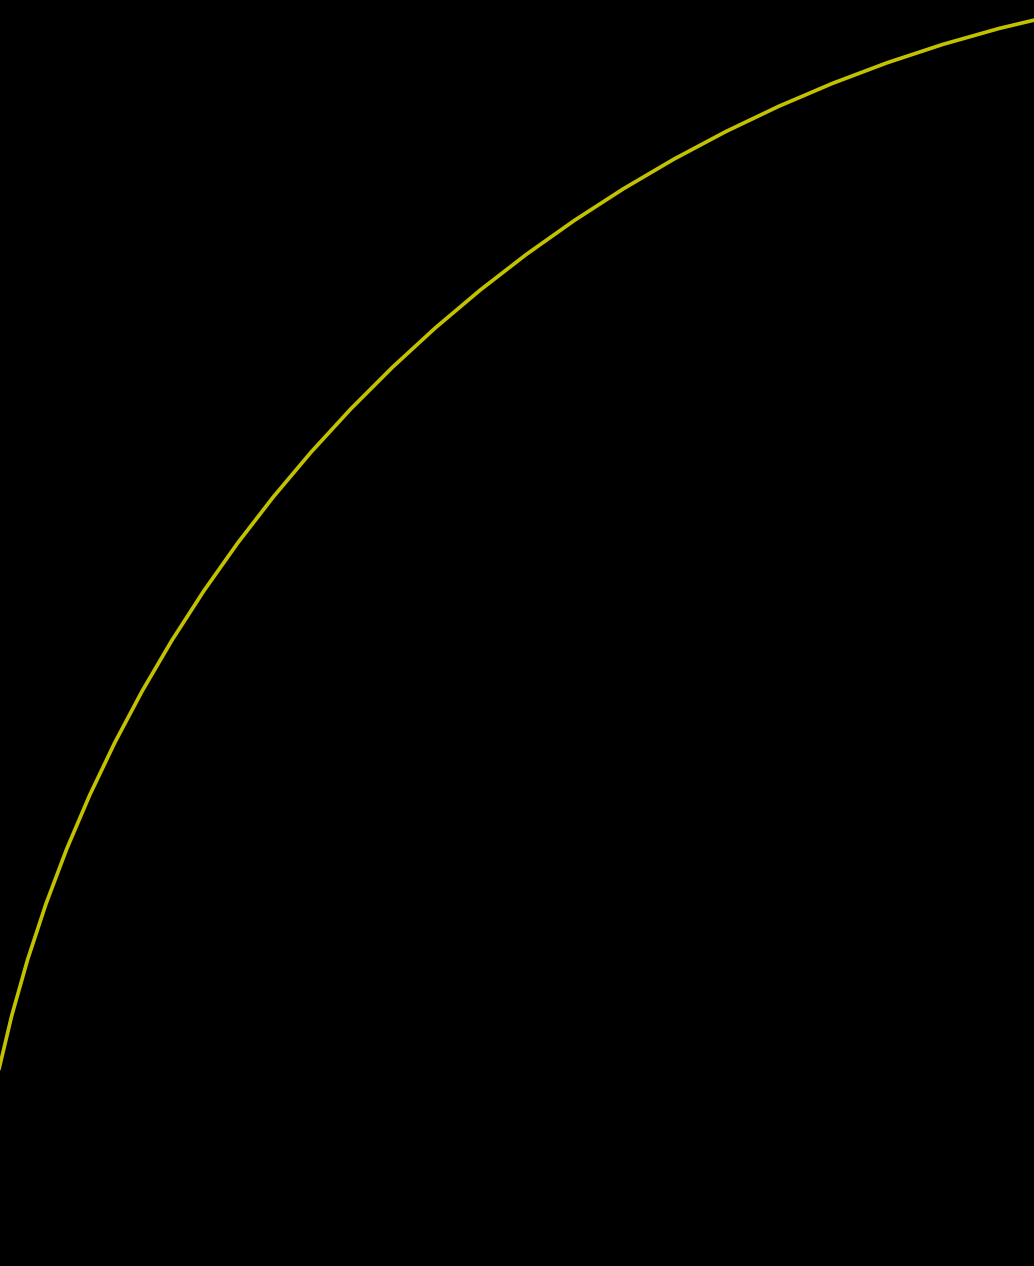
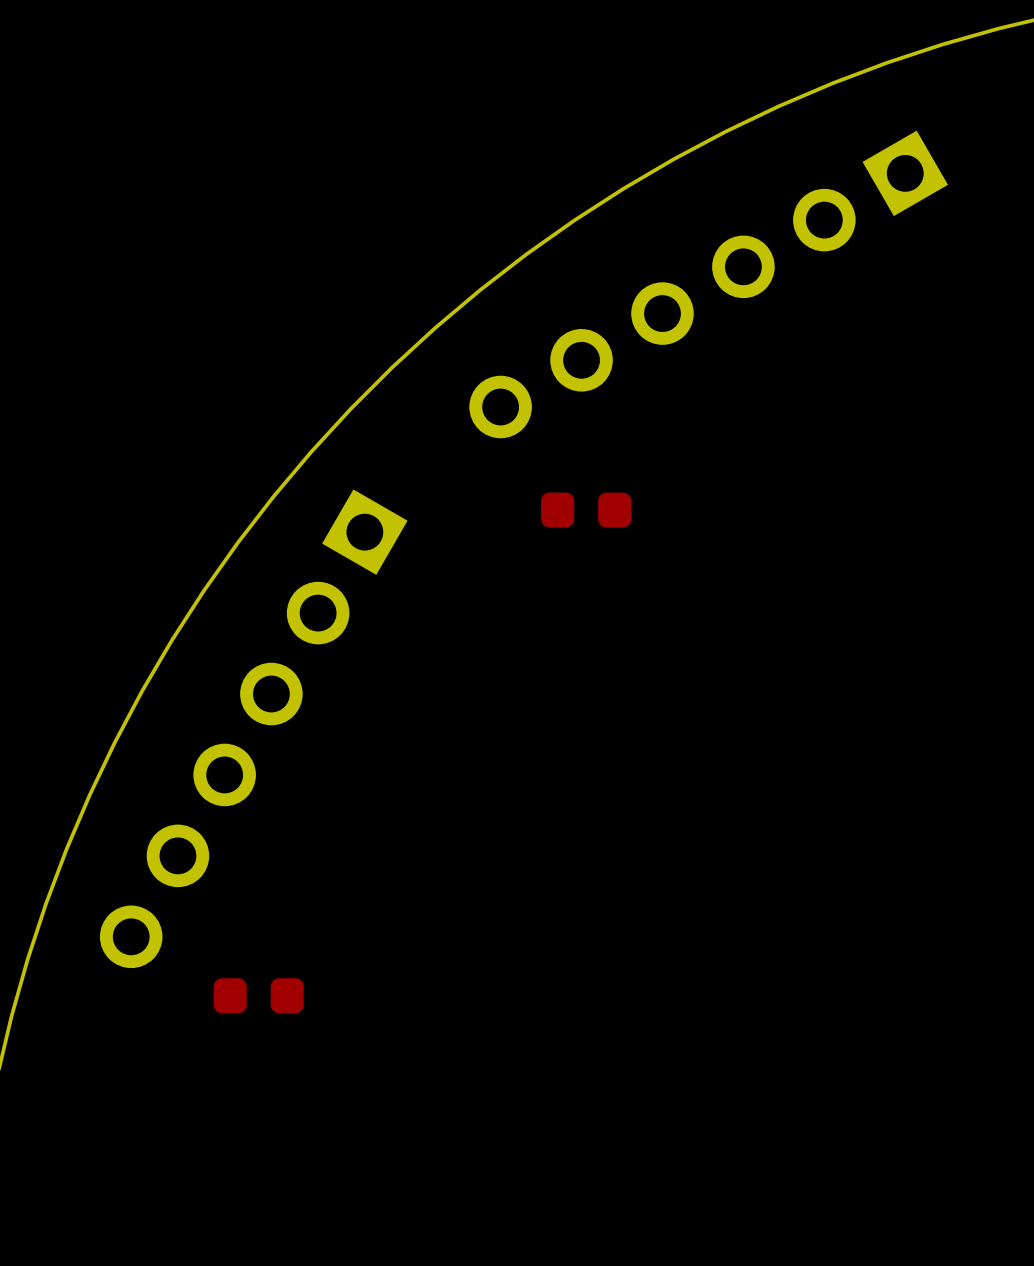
part: none -> (708, 284)
part: none -> (586, 510)
part: none -> (253, 728)
part: none -> (258, 995)

